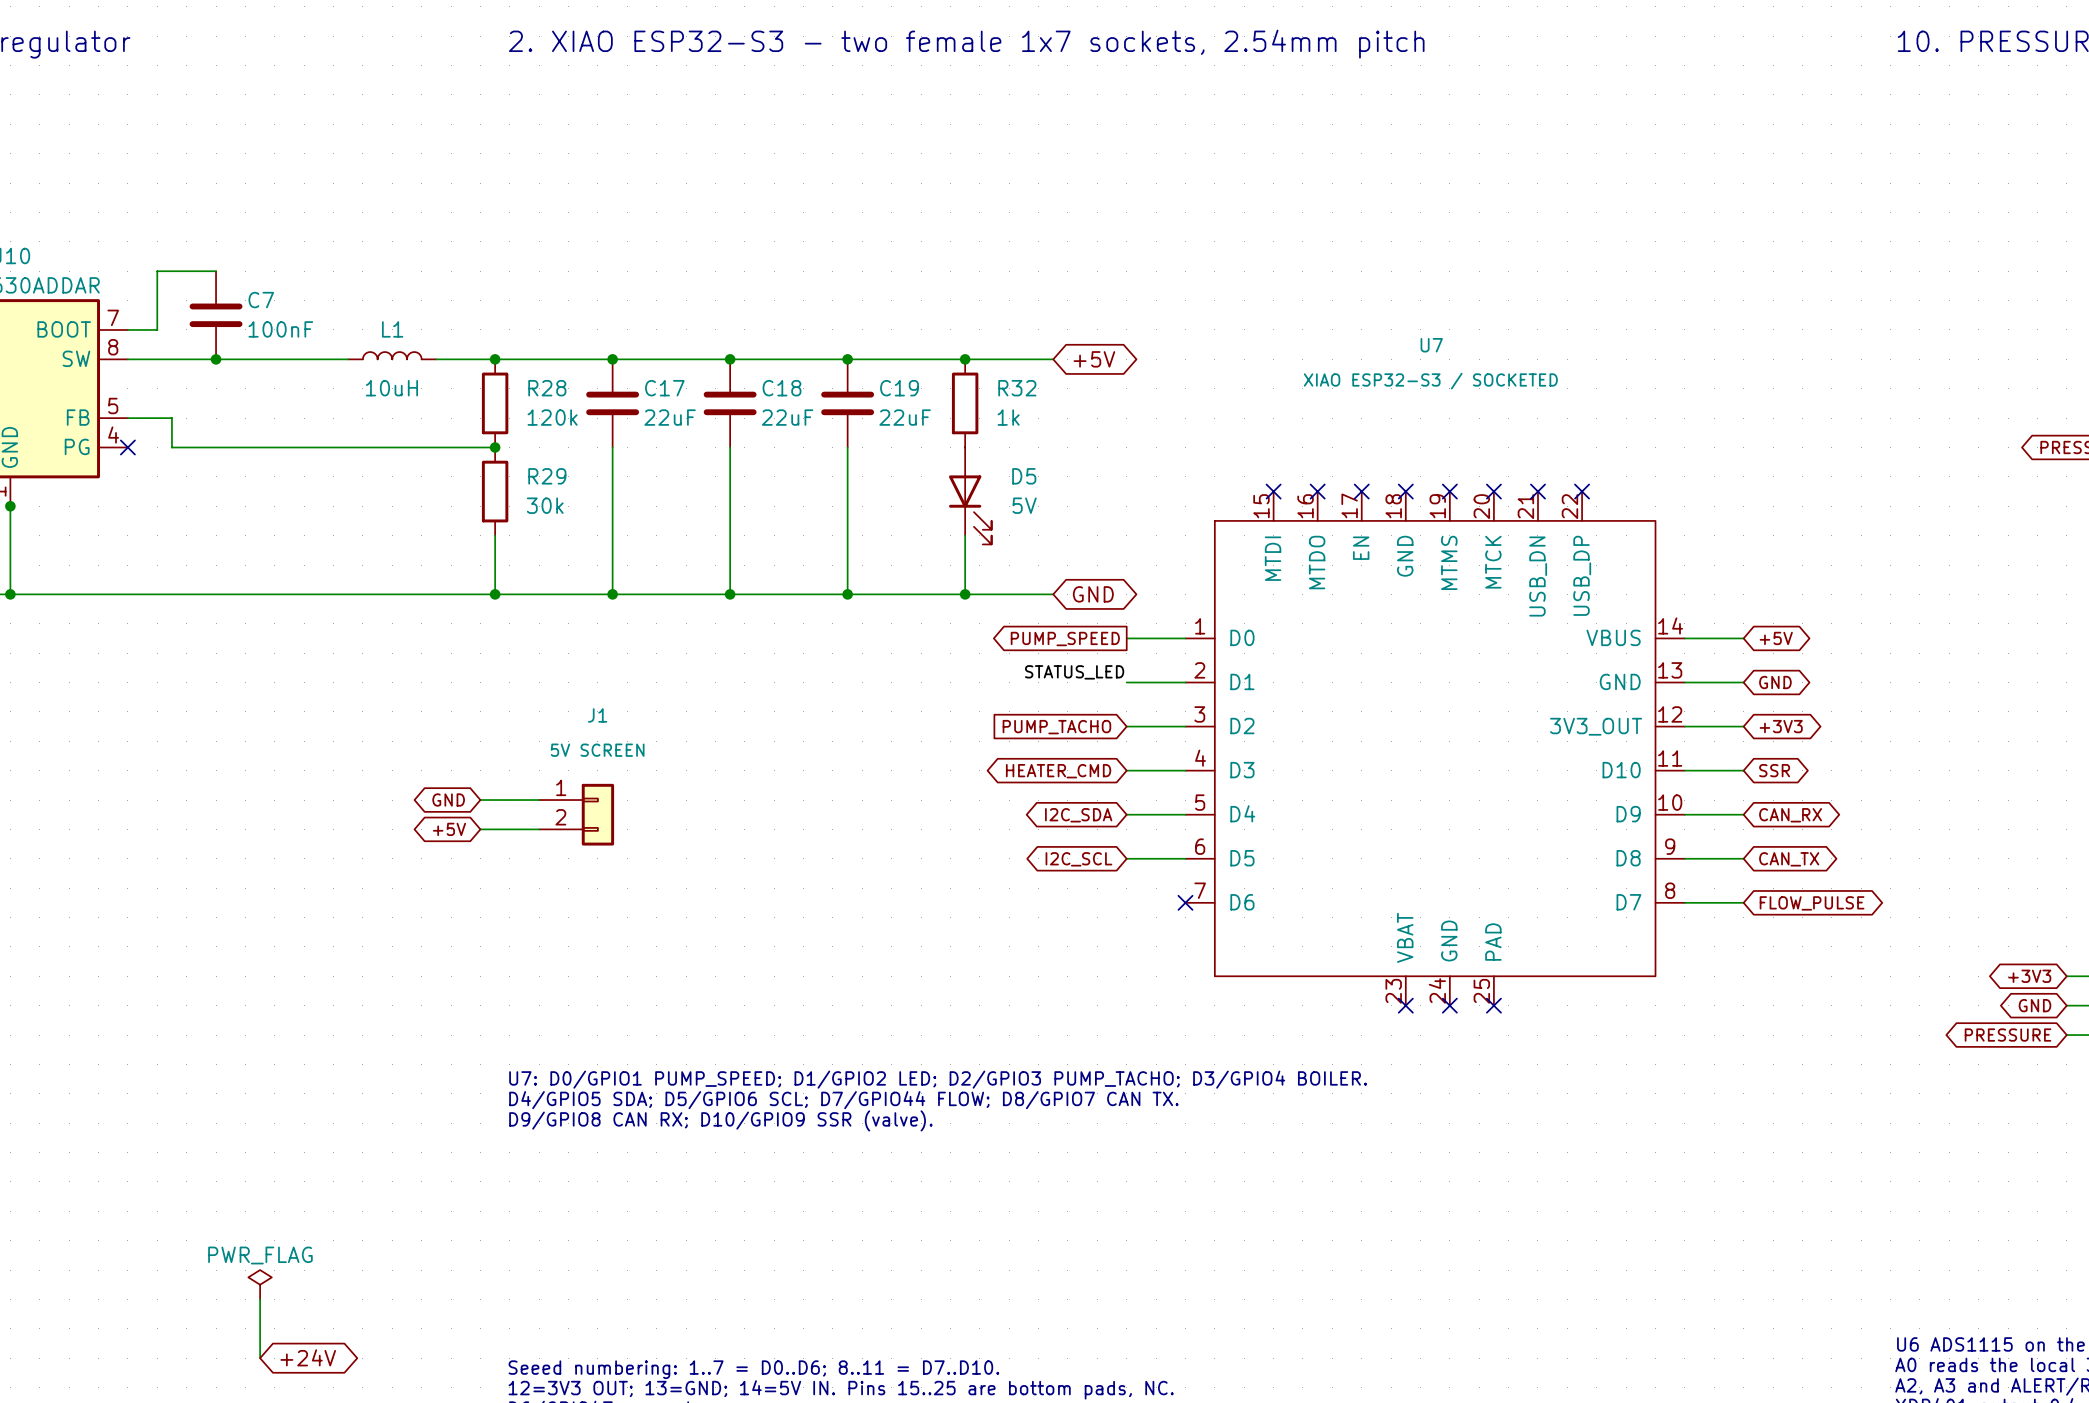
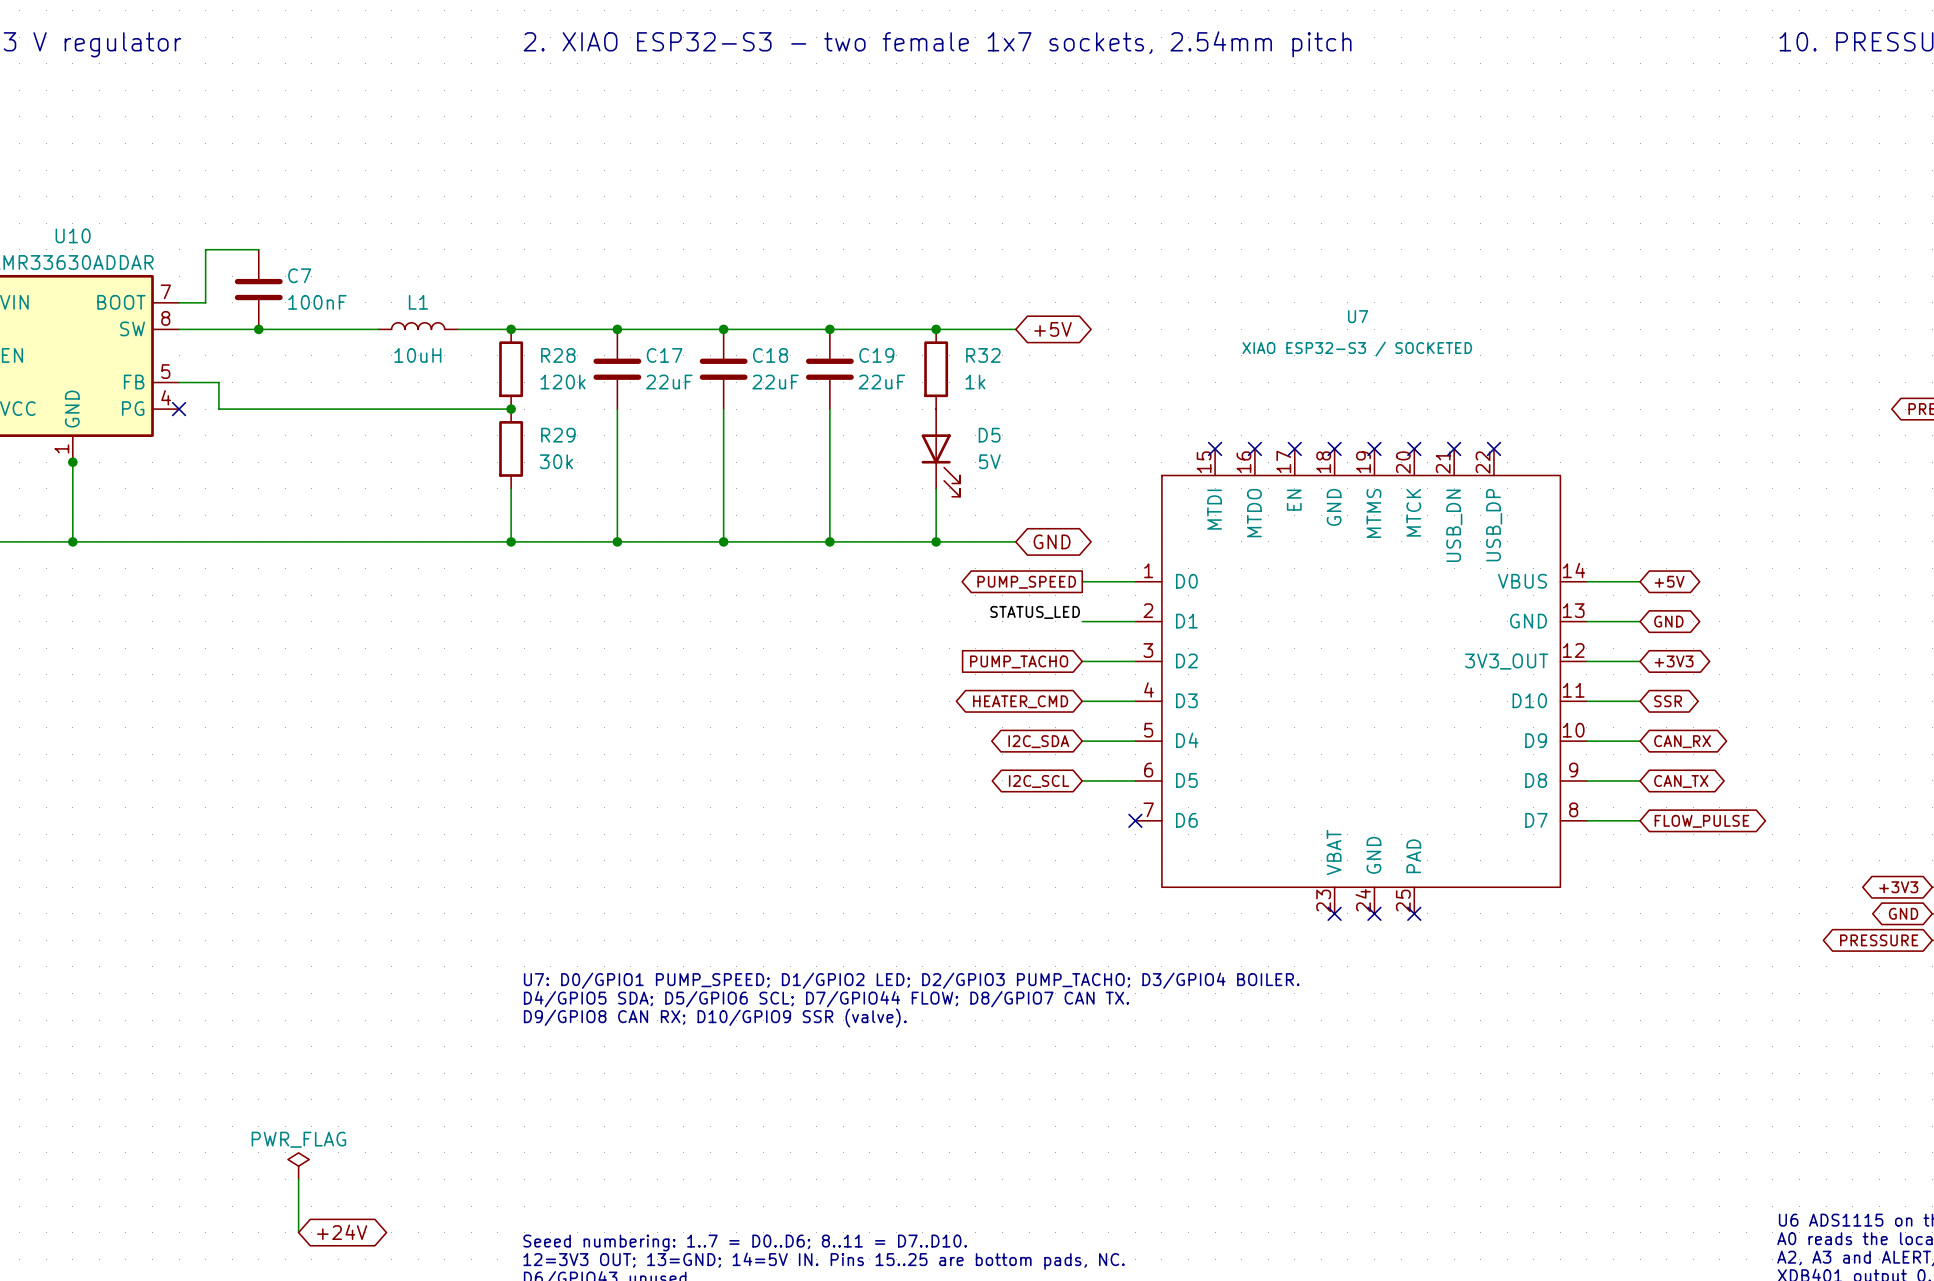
global label: GND (448, 800) -> none
wire: (480, 800) (539, 800) -> none
J1: 5V SCREEN (576, 814) -> none
global label: +5V (449, 829) -> none
wire: (480, 829) (539, 829) -> none

